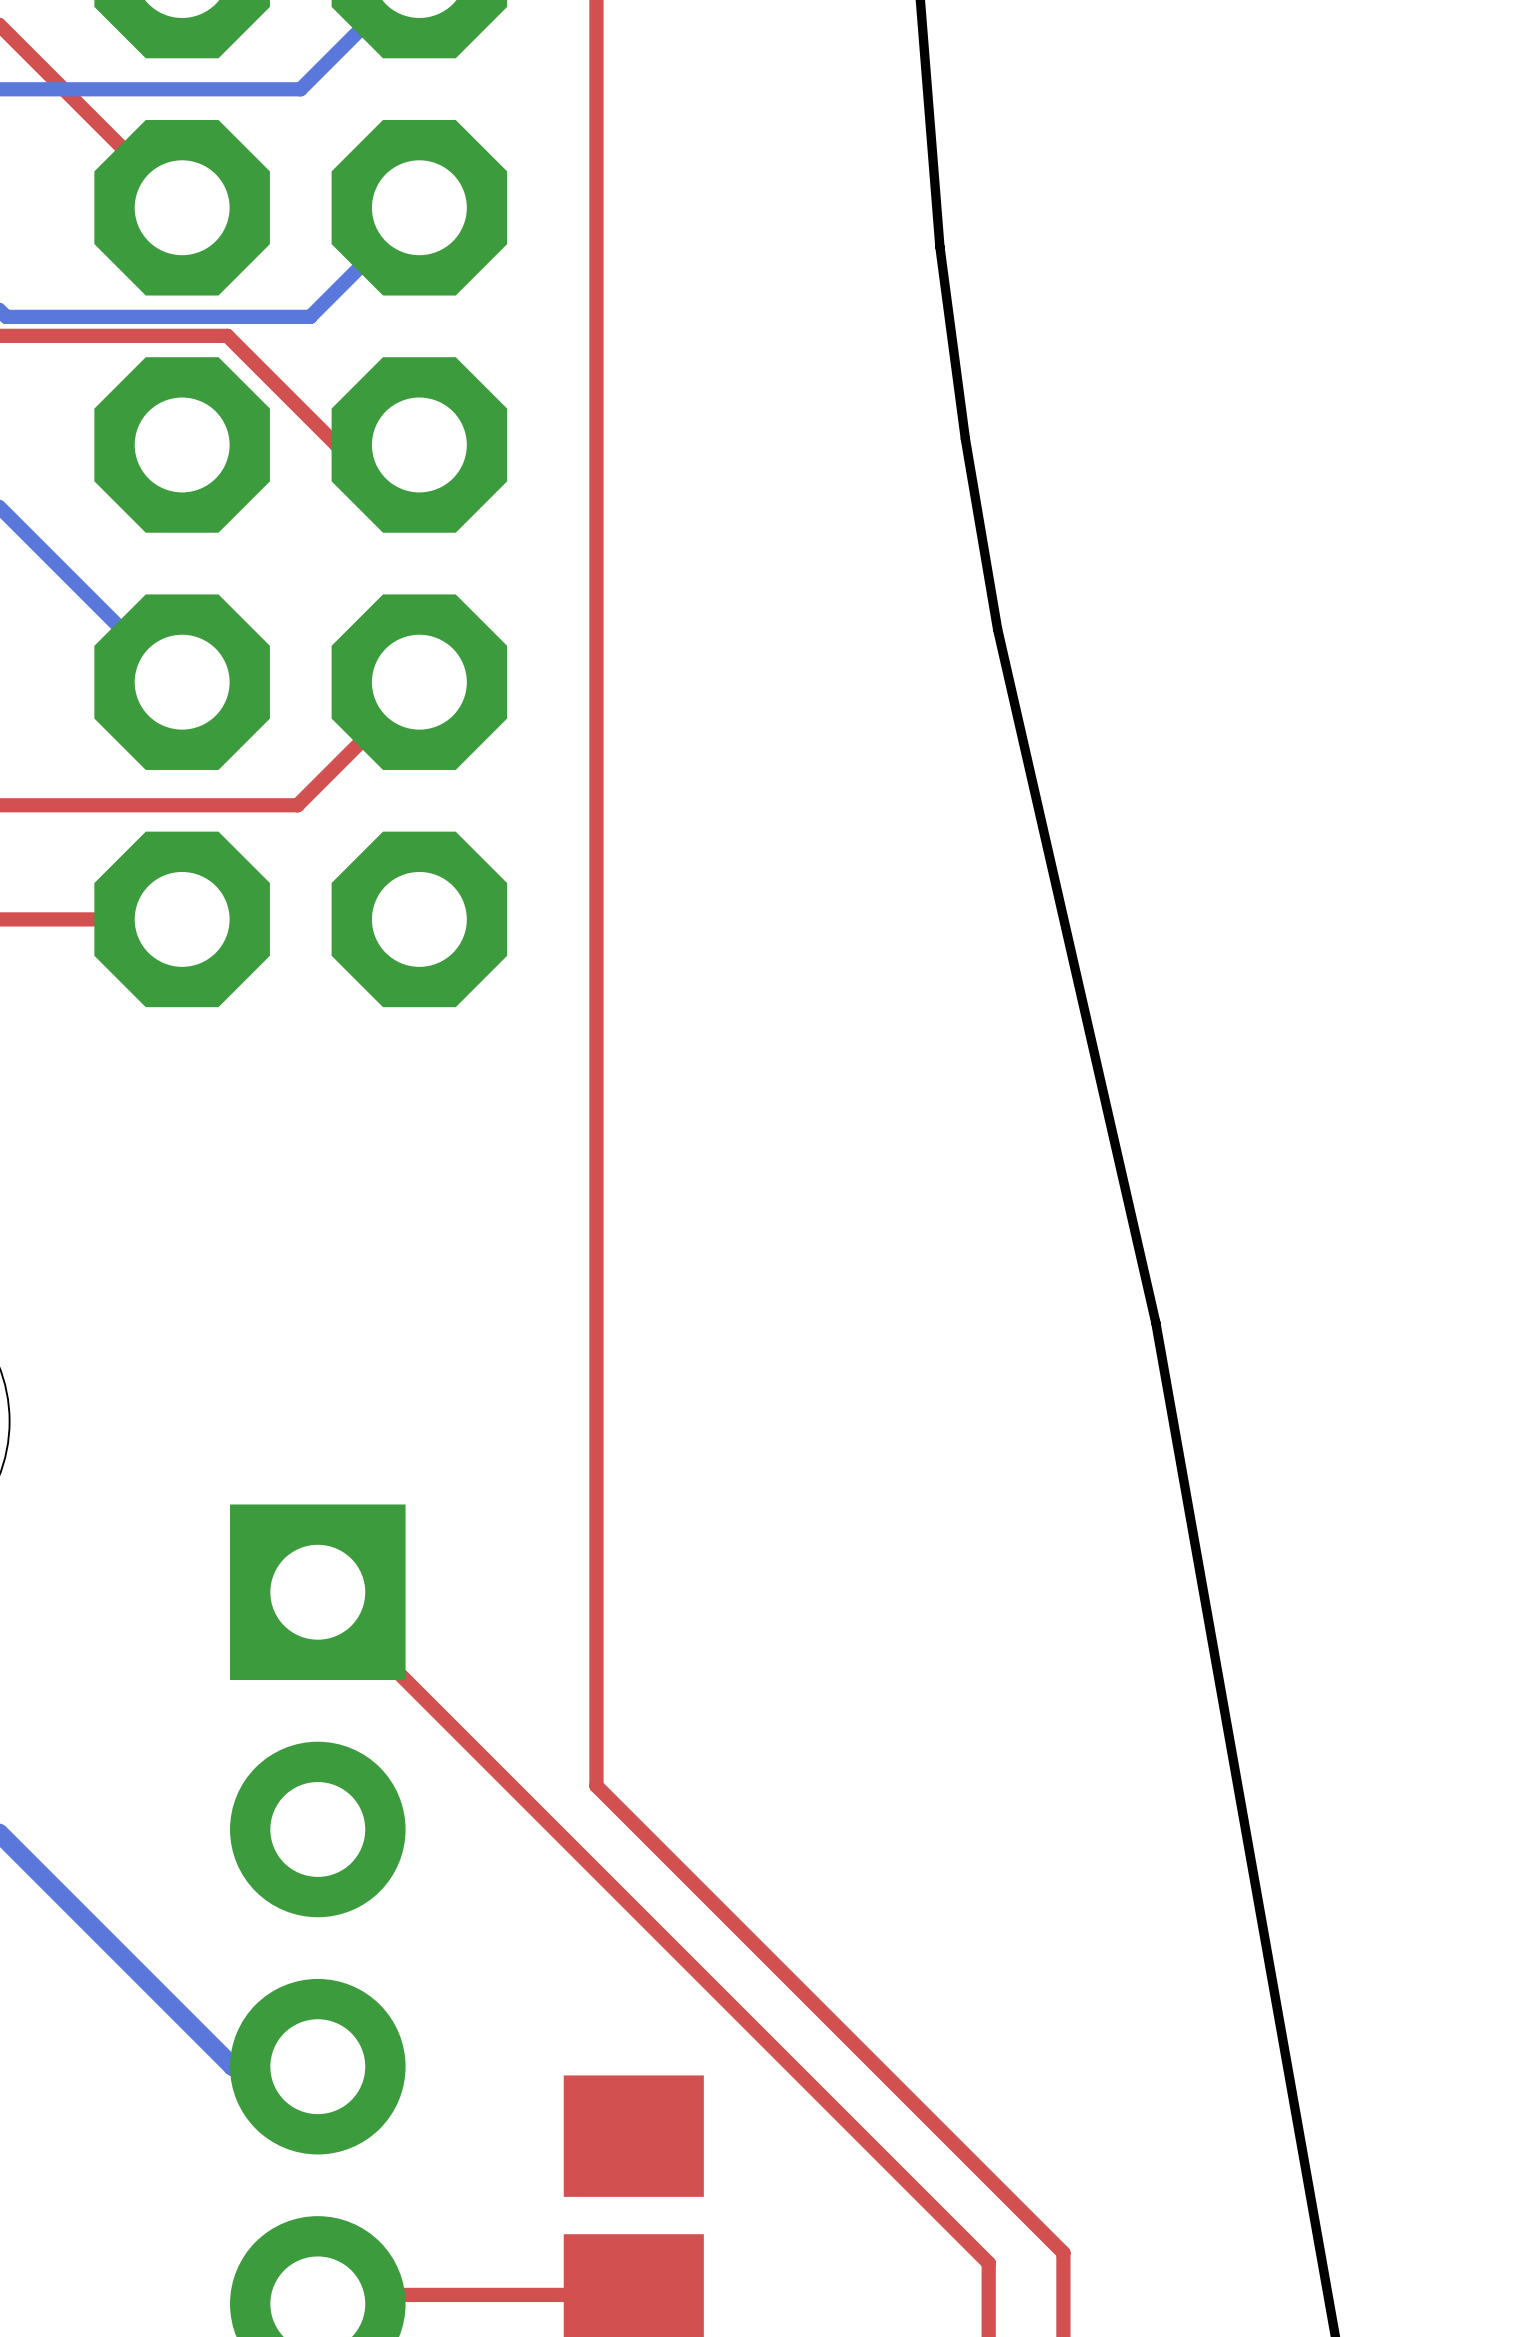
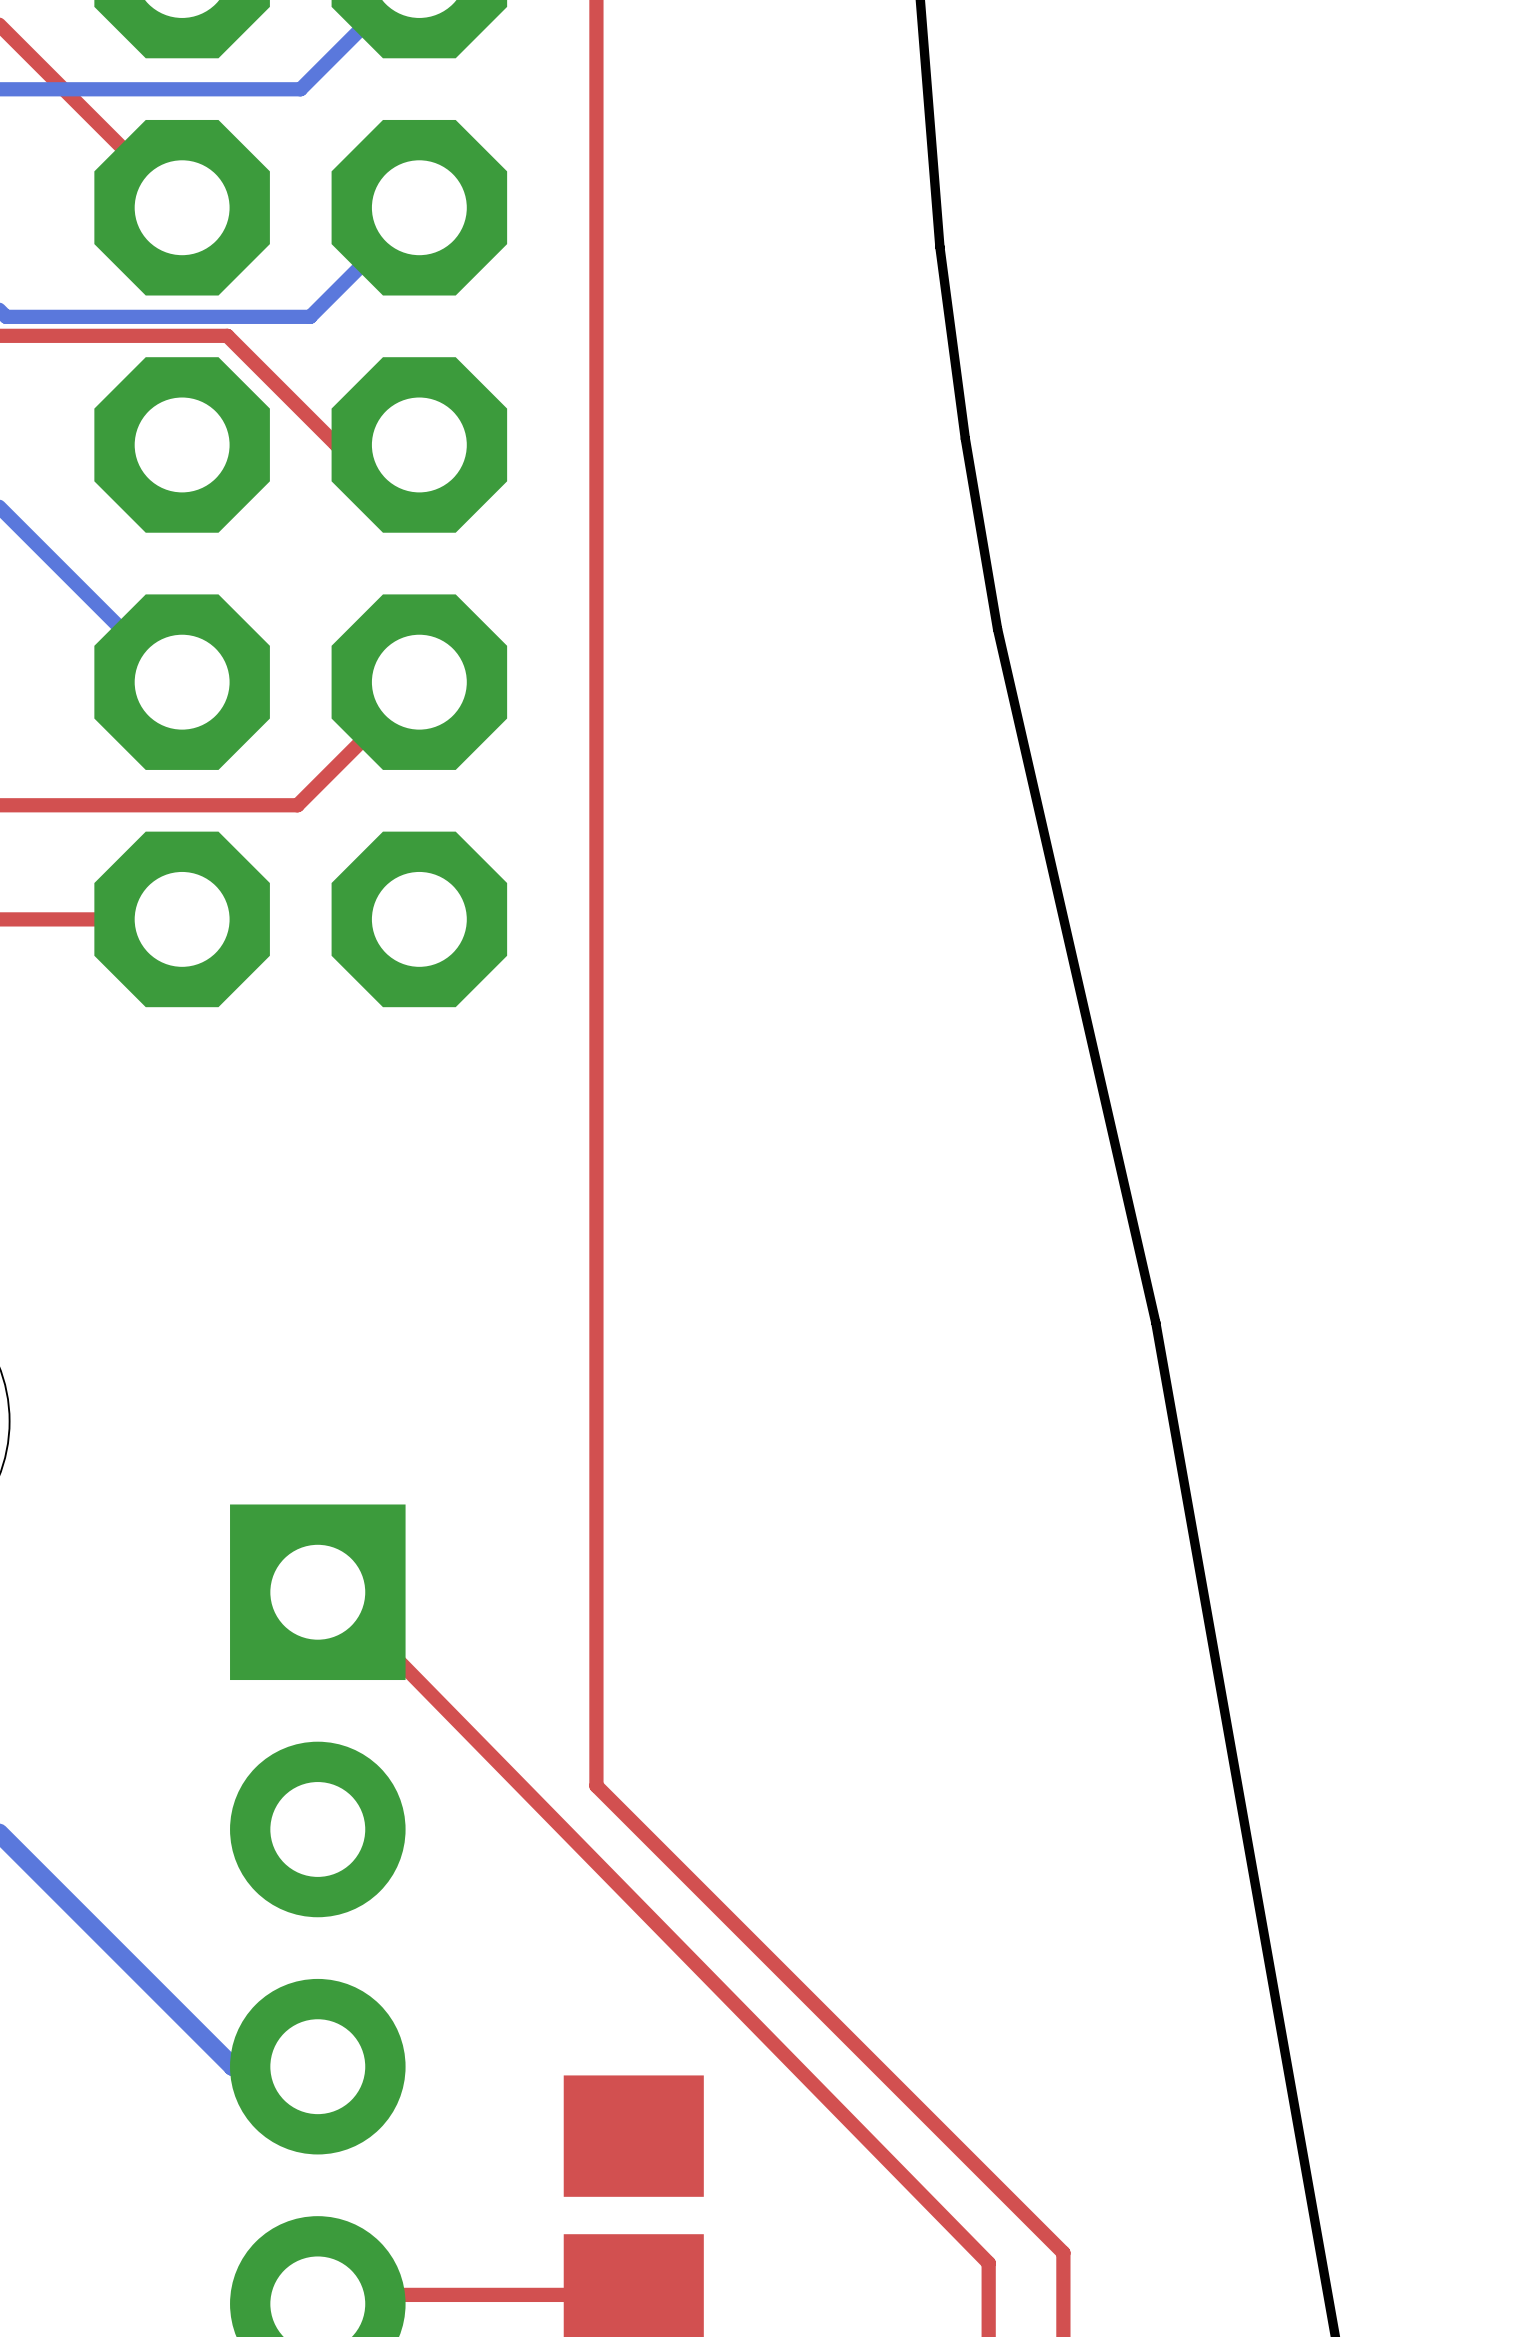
top track: (317, 1592) (988, 2263) -> (330, 1591) (988, 2263)

